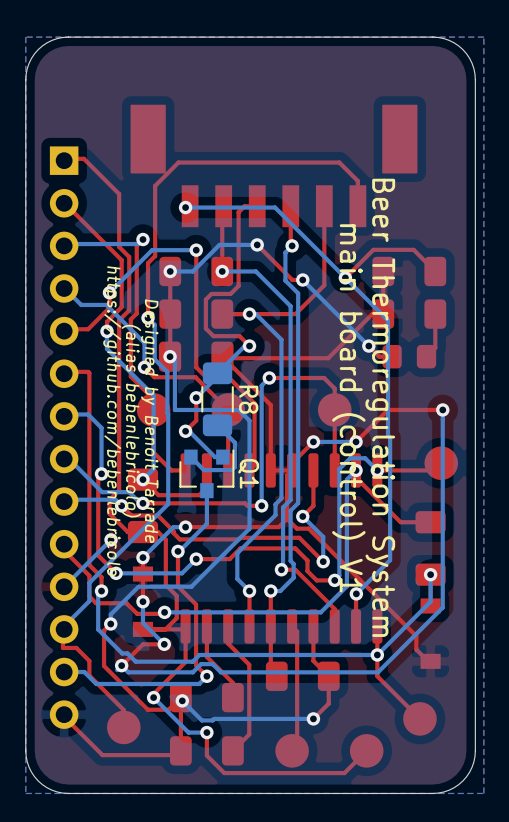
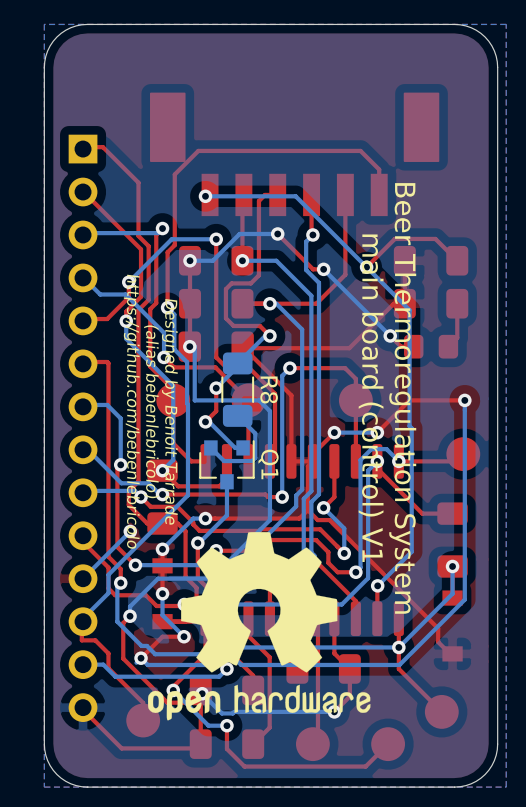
drawing: none -> [147, 532, 371, 721]

